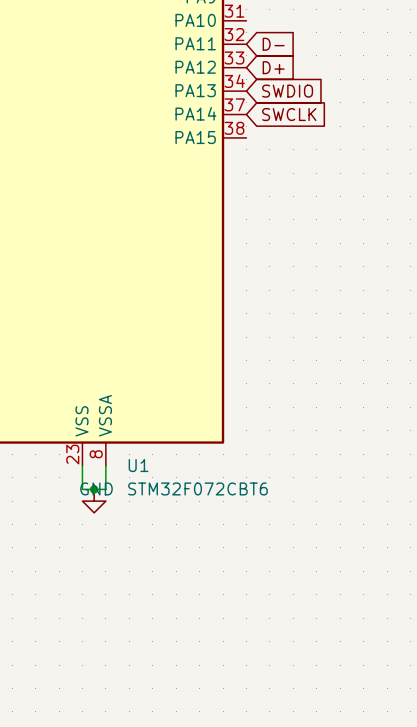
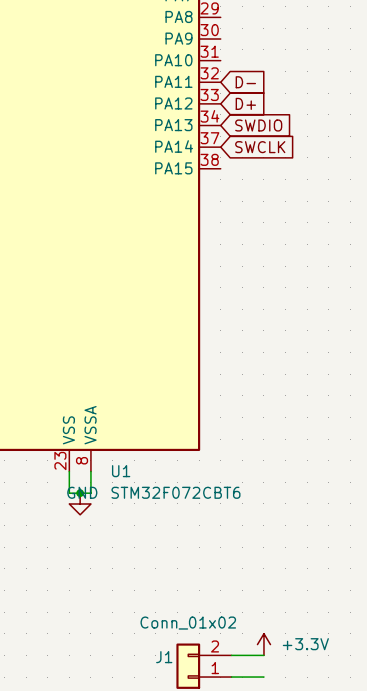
power symbol: none -> +3.3V (263, 644)
wire: none -> (231, 655) (263, 655)
J1: none -> Conn_01x02 (203, 666)
wire: none -> (231, 677) (263, 677)

